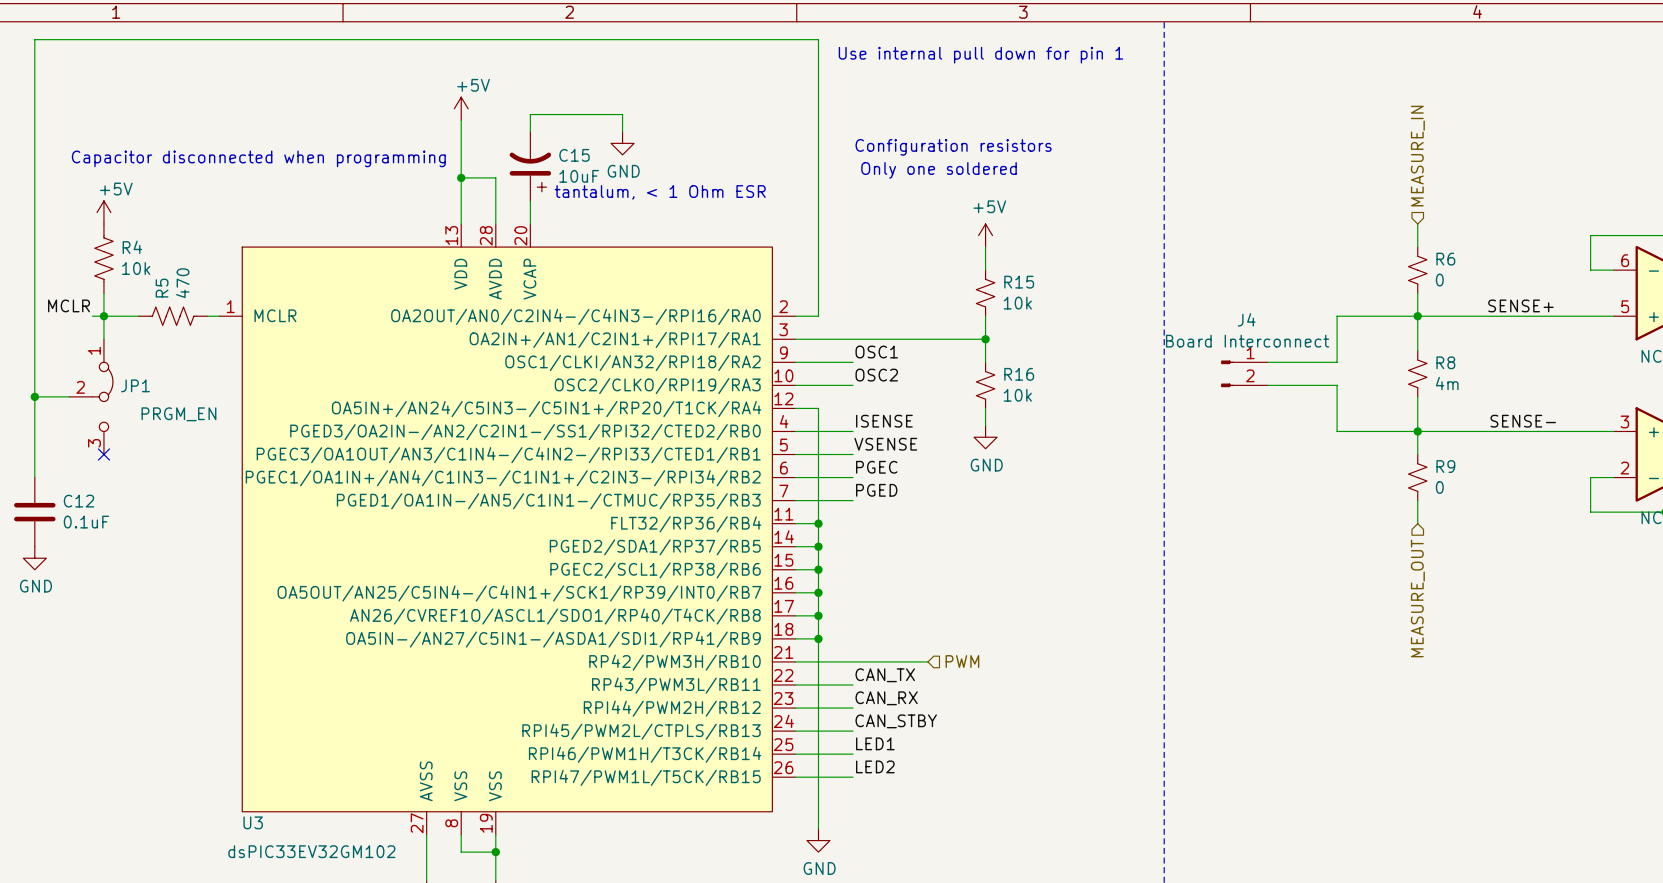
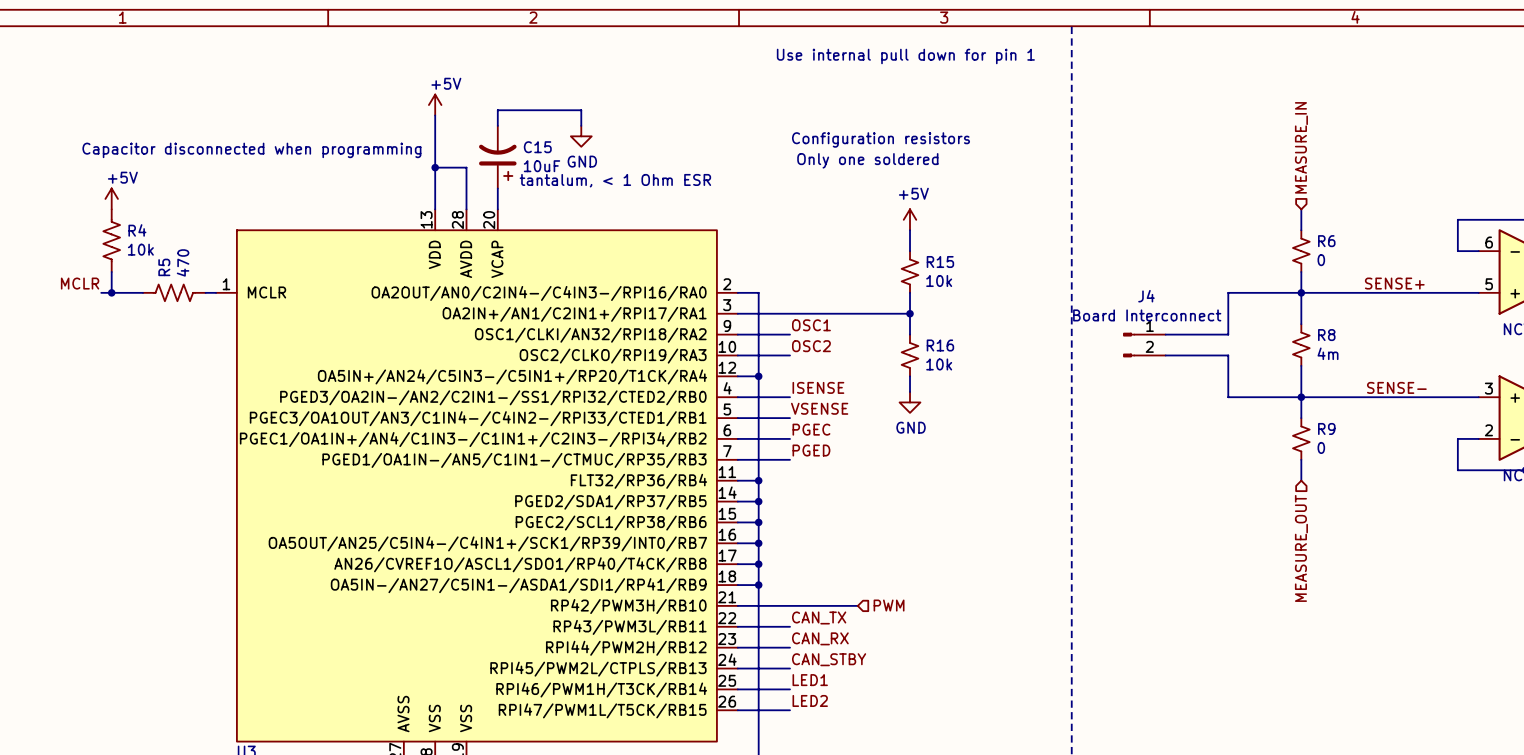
wire: (103, 316) (103, 339) -> none
wire: (818, 316) (818, 39) (34, 39) (34, 396) -> (758, 292) (758, 376)
wire: (34, 396) (69, 396) -> none
wire: (34, 396) (34, 477) -> none
junction: (34, 396) -> none
JP1: PRGM_EN (91, 396) -> none
junction: none -> (758, 376)
no-connect mark: (103, 454) -> none
C12: 0.1uF (34, 512) -> none
power symbol: GND (34, 558) -> none

